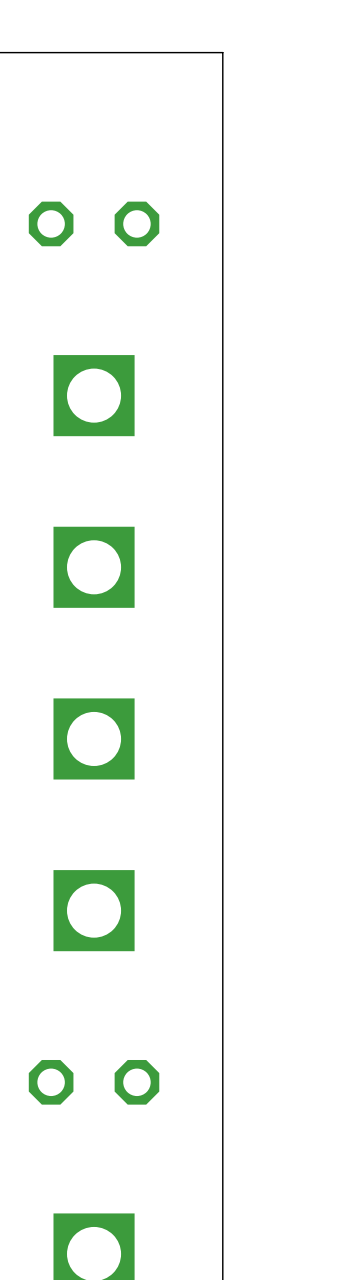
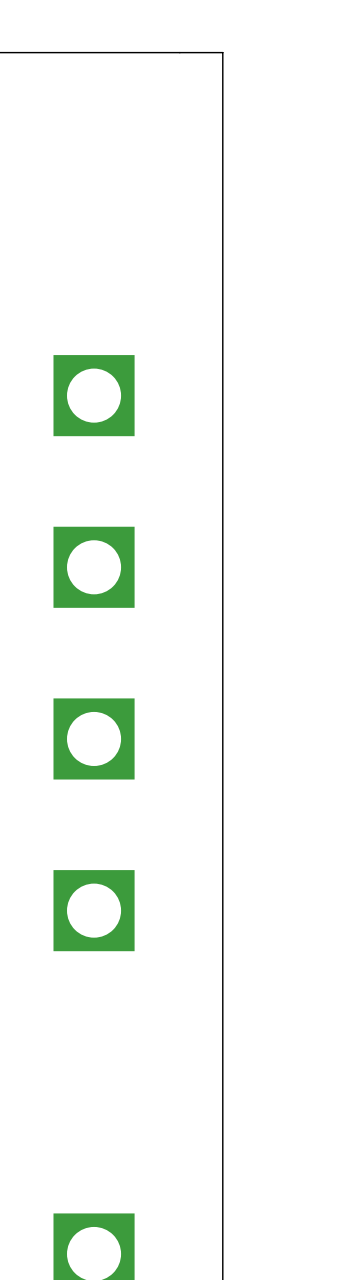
part: (94, 223) -> none
part: (94, 1082) -> none

